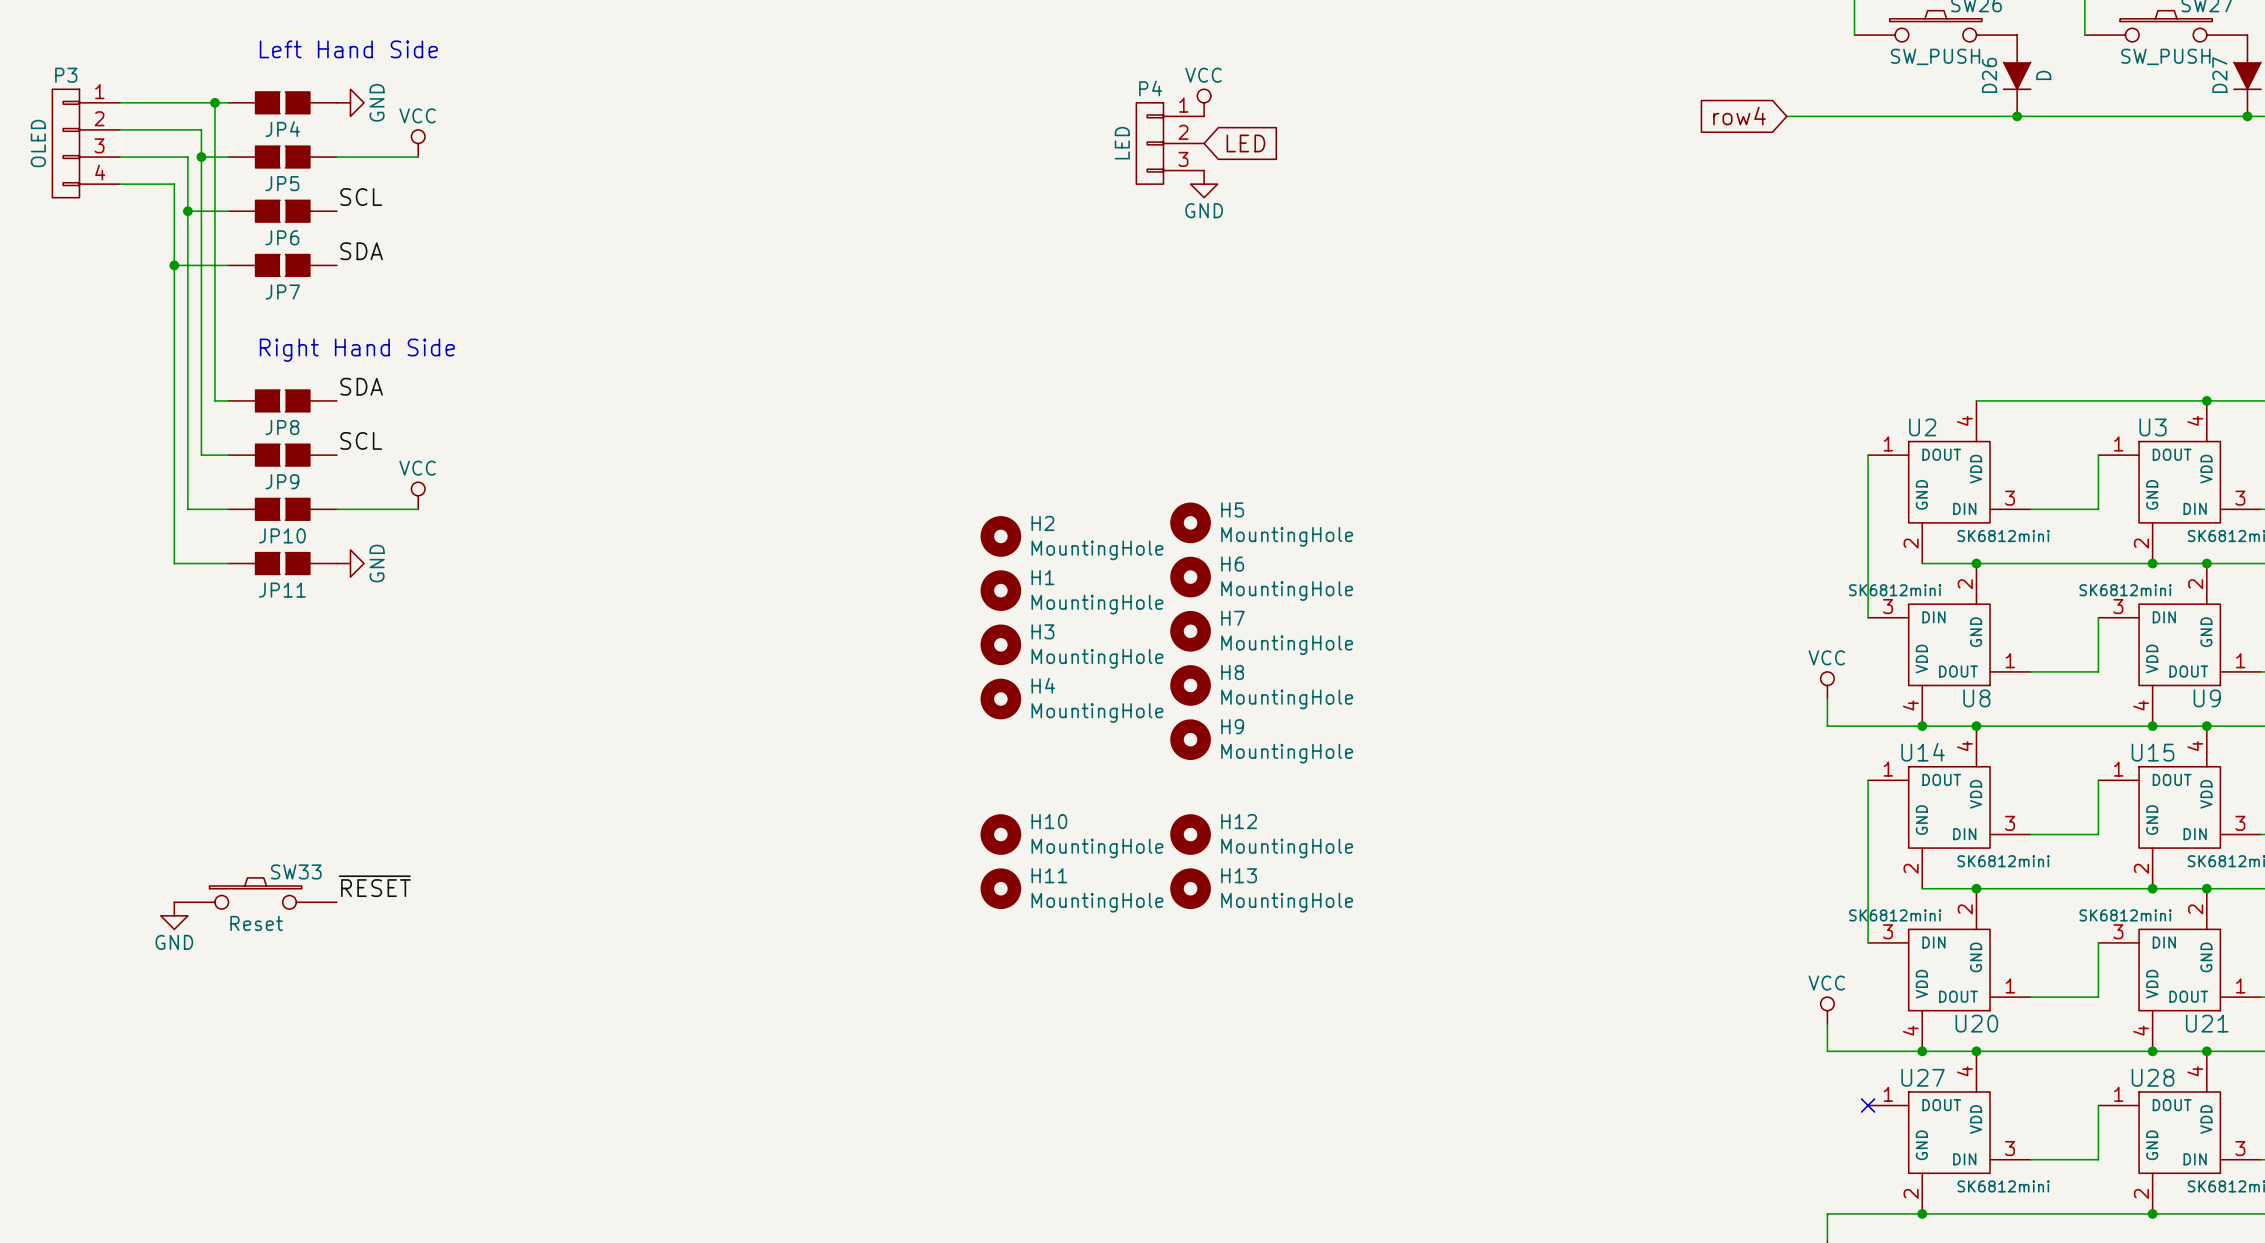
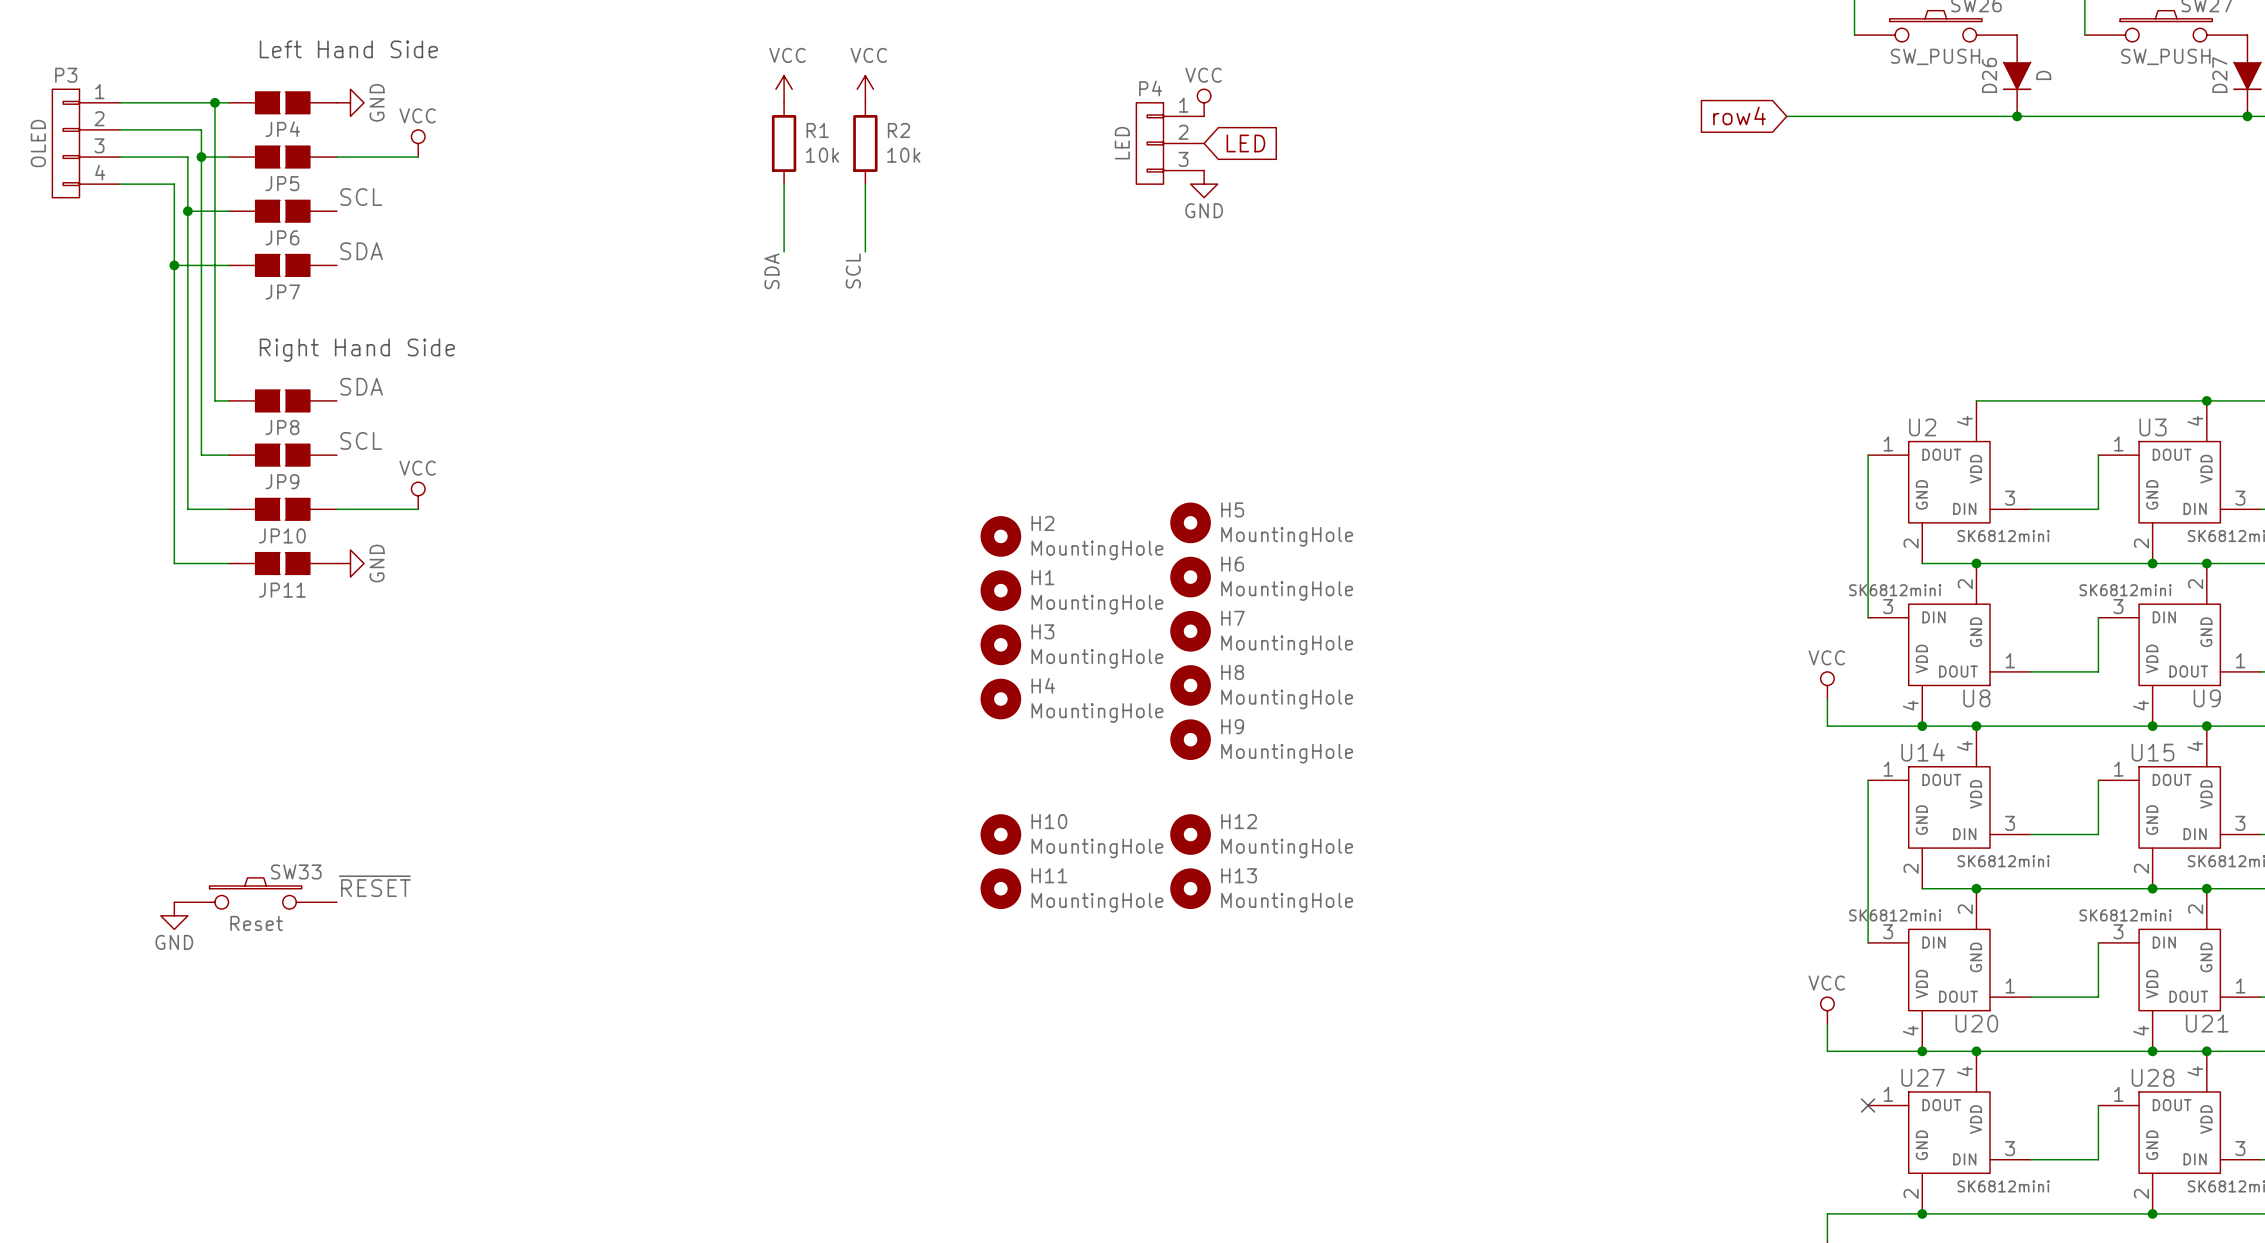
power symbol: none -> VCC (784, 89)
power symbol: none -> VCC (865, 89)
R1: none -> 10k (784, 143)
R2: none -> 10k (865, 143)
wire: none -> (784, 184) (784, 251)
wire: none -> (865, 184) (865, 251)
label: none -> SDA (771, 271)
label: none -> SCL (853, 271)

